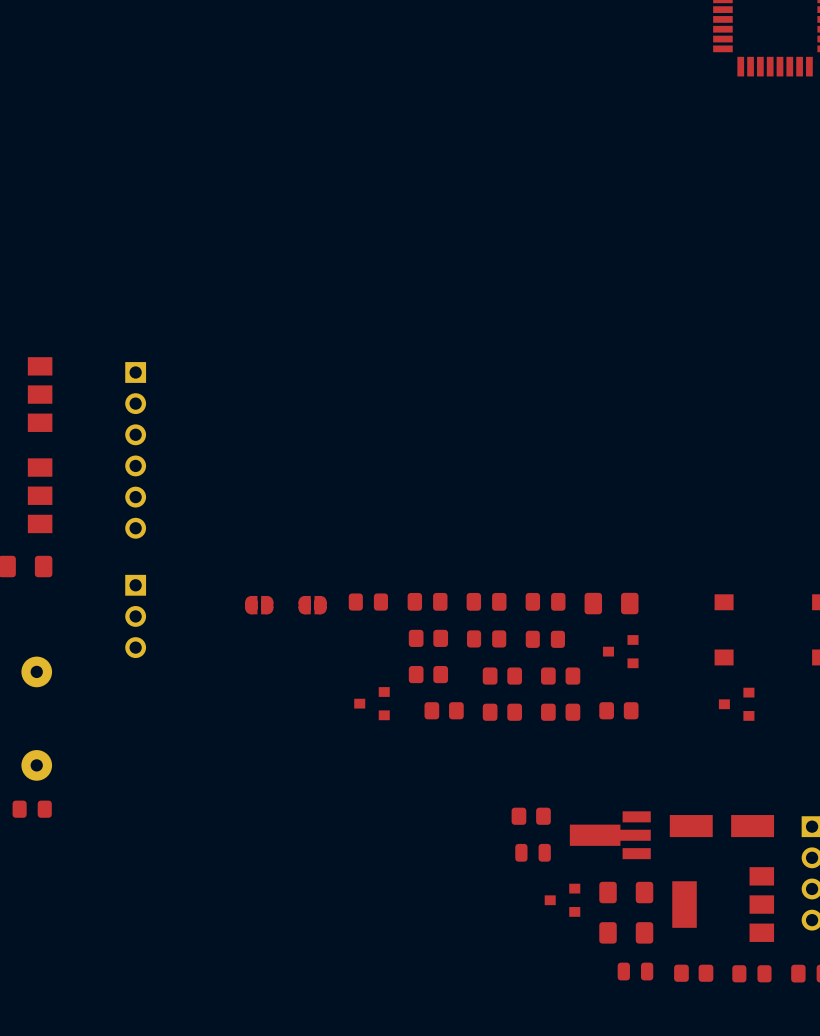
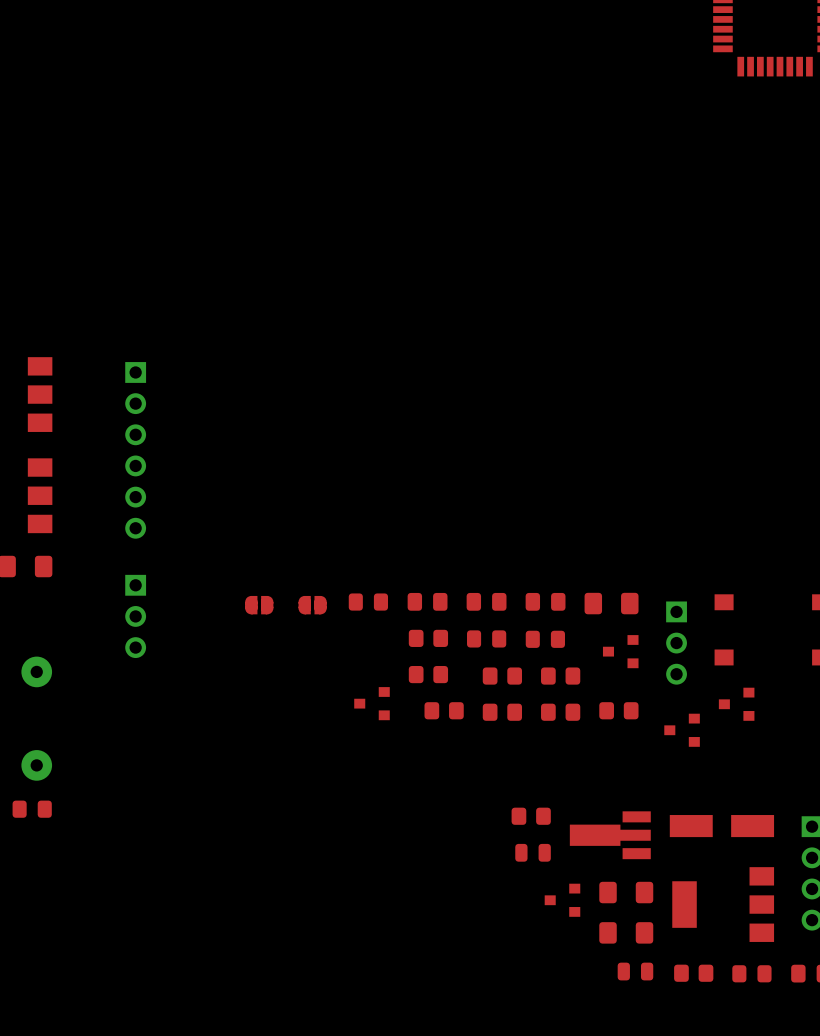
part: none -> (676, 643)
part: none -> (682, 730)

